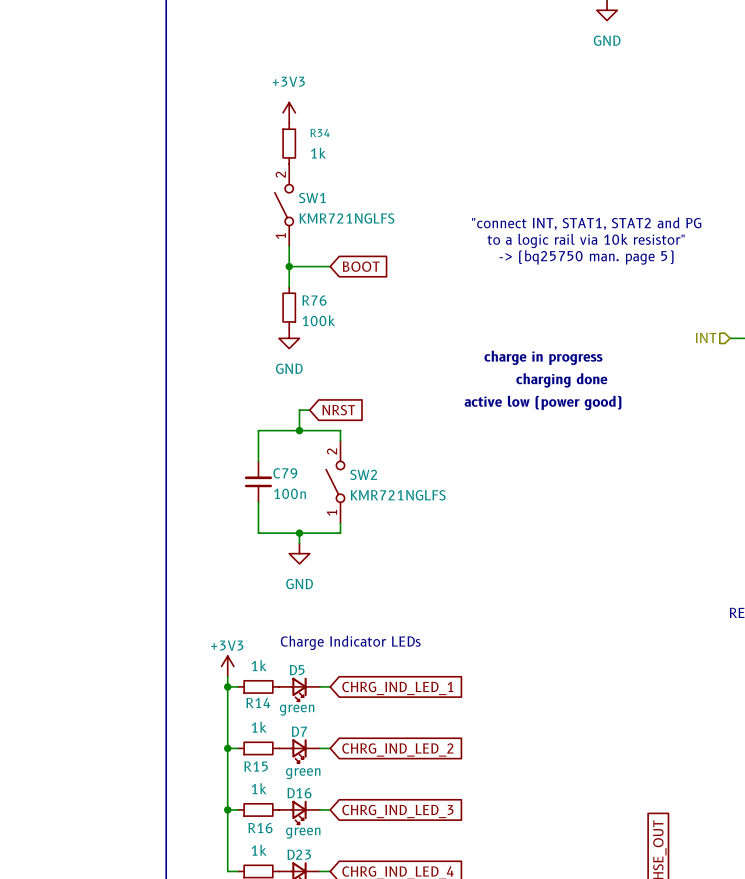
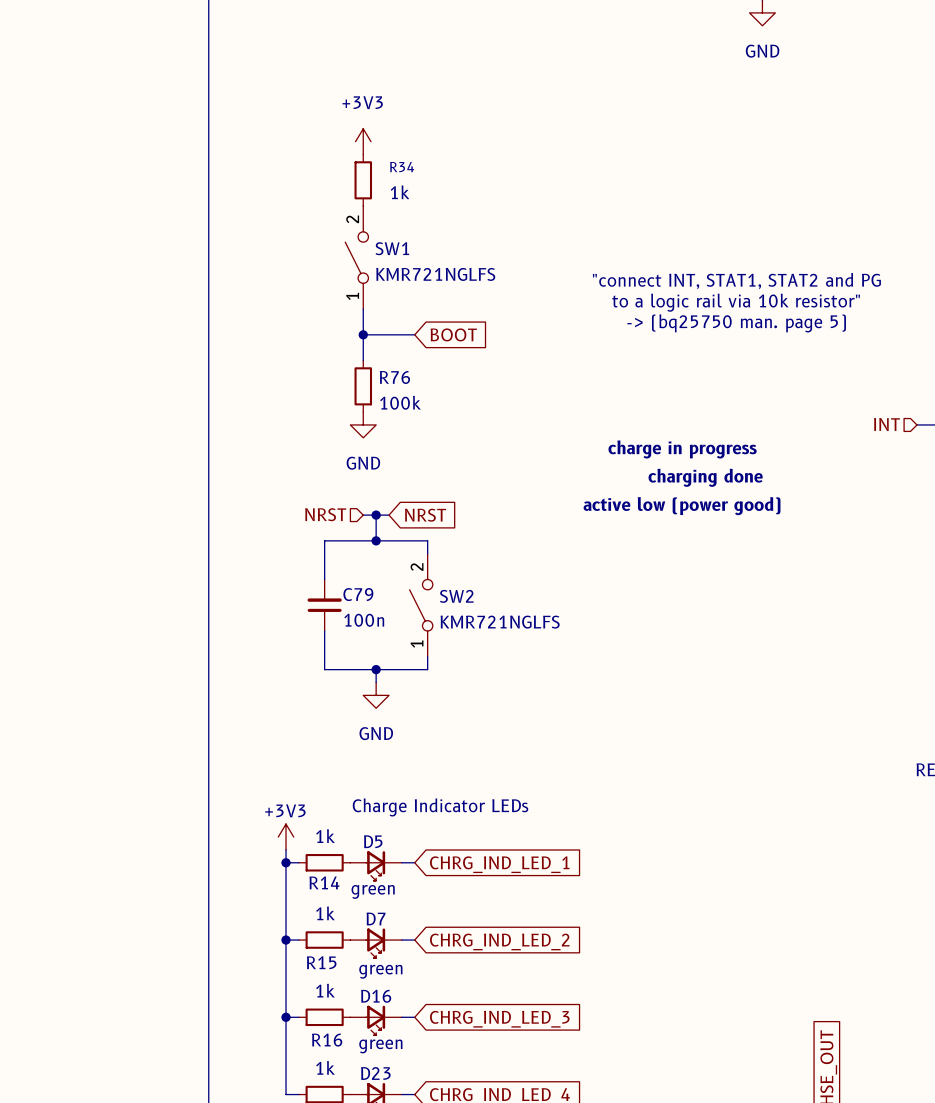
hierarchical label: none -> NRST (325, 514)
wire: none -> (363, 515) (376, 515)
junction: none -> (376, 515)

